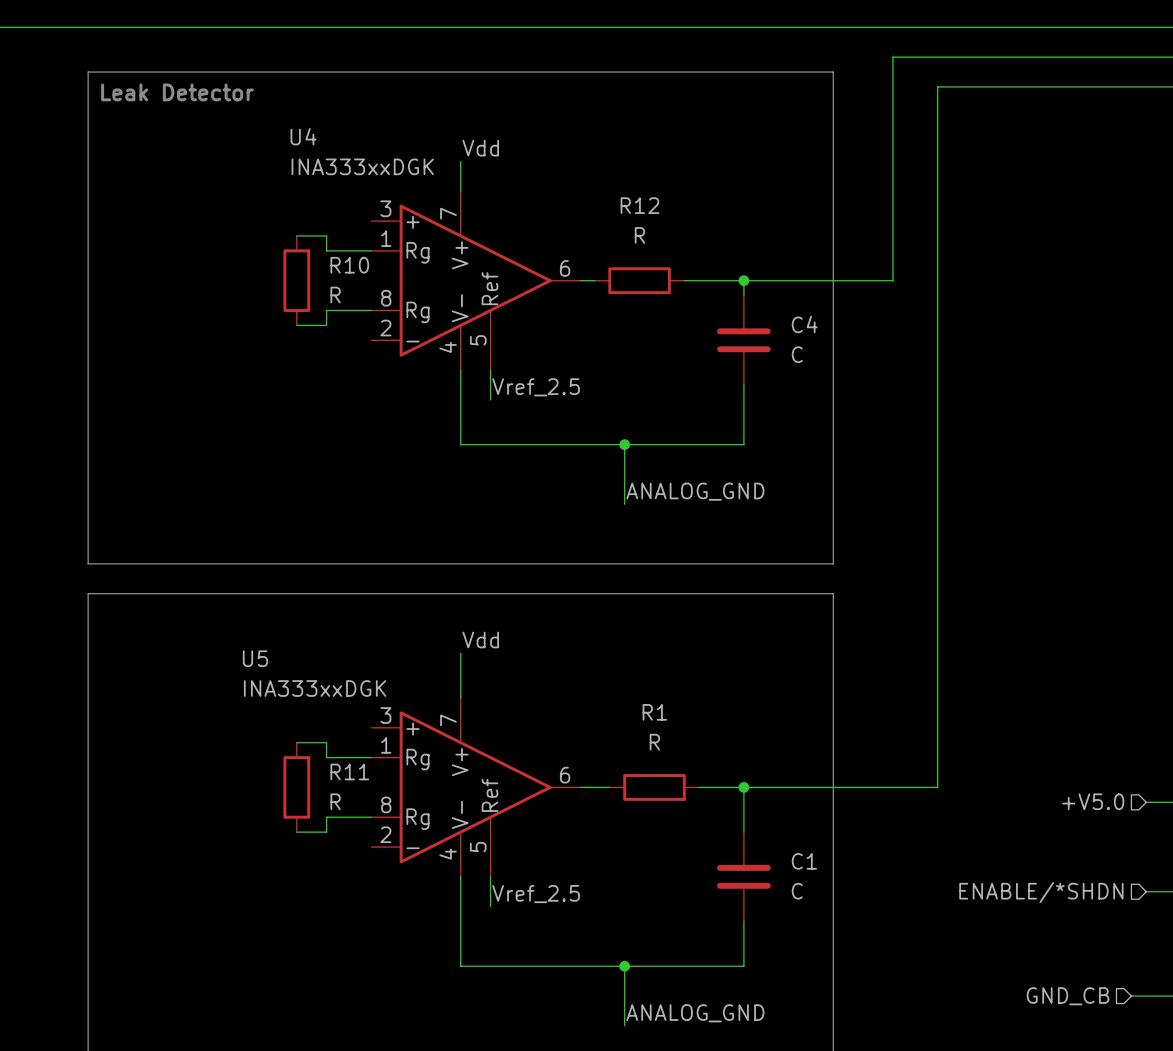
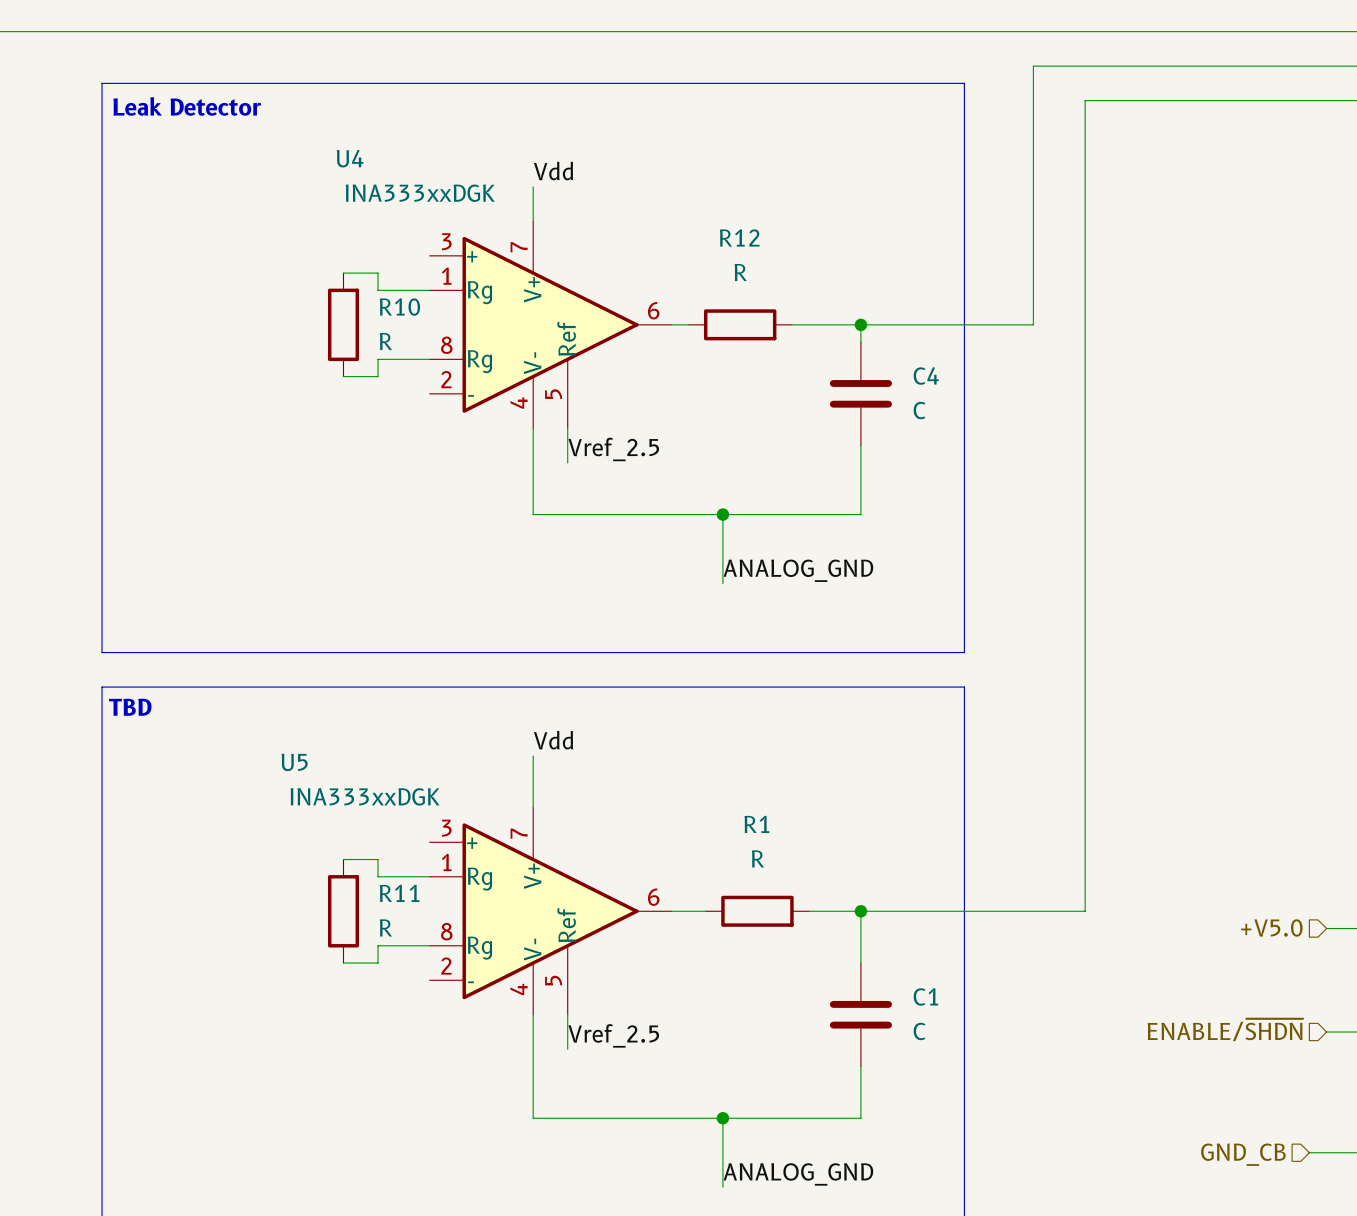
text: none -> TBD (130, 707)
hierarchical label: ENABLE/*SHDN (1041, 892) -> ENABLE/~{SHDN} (1225, 1029)

